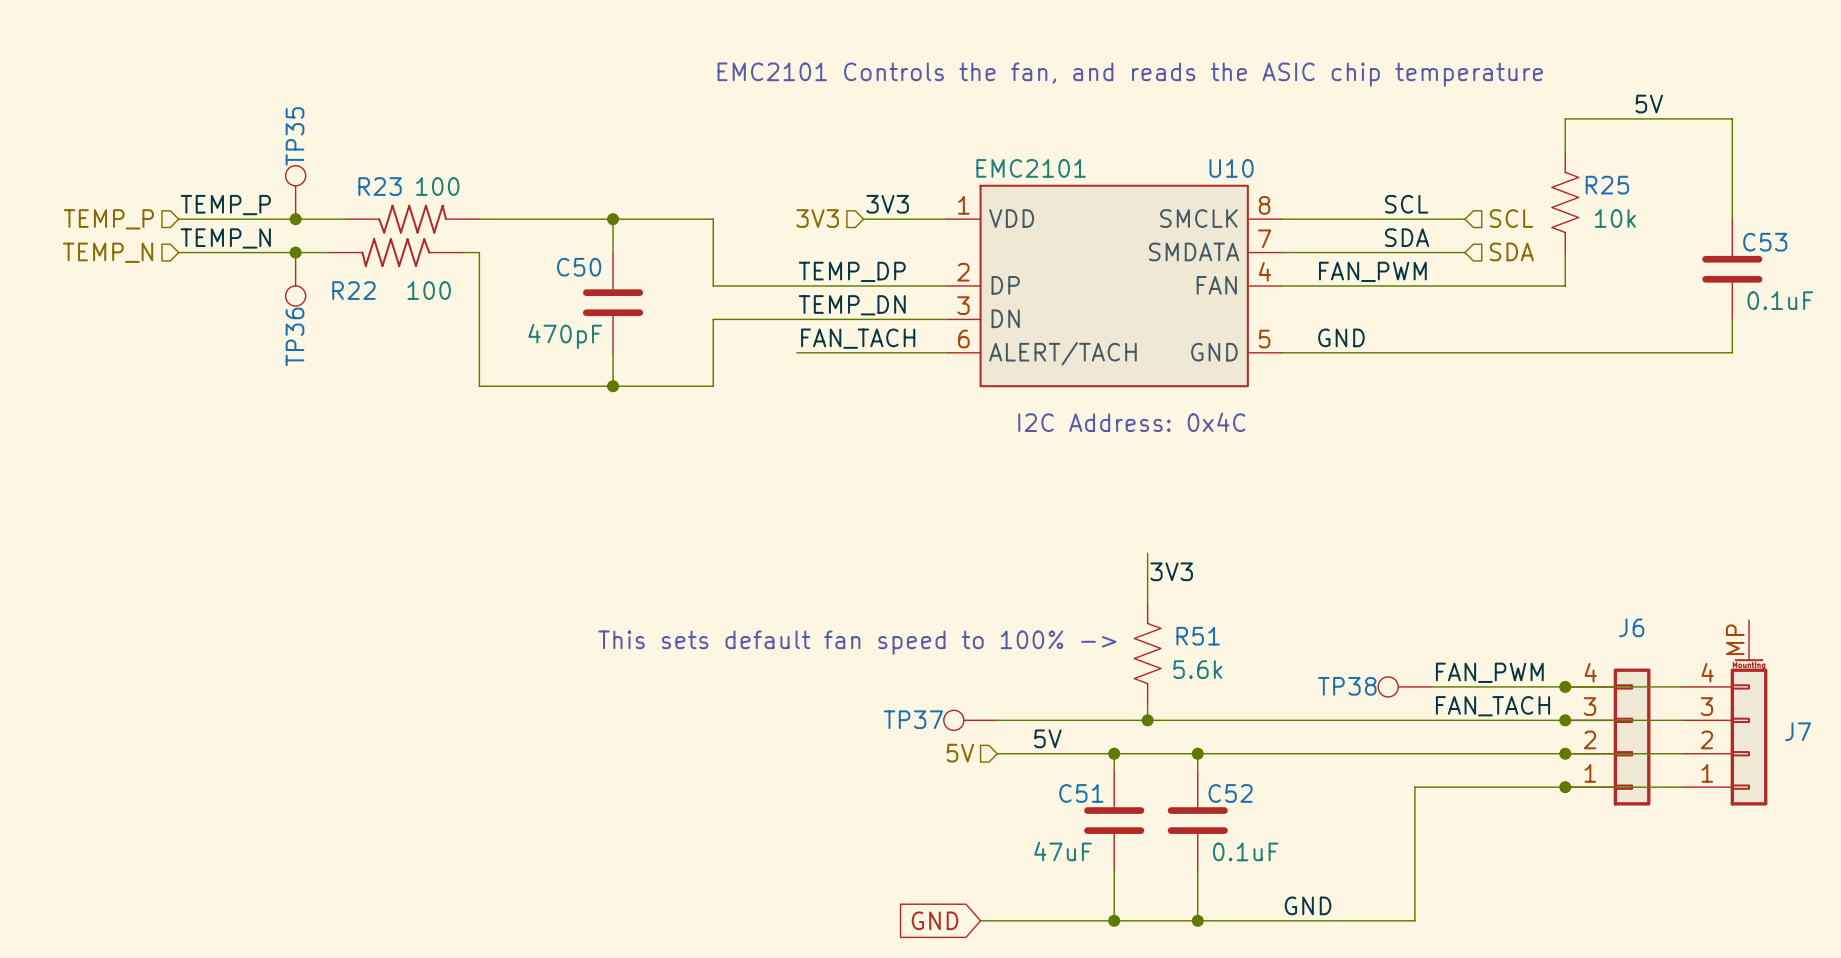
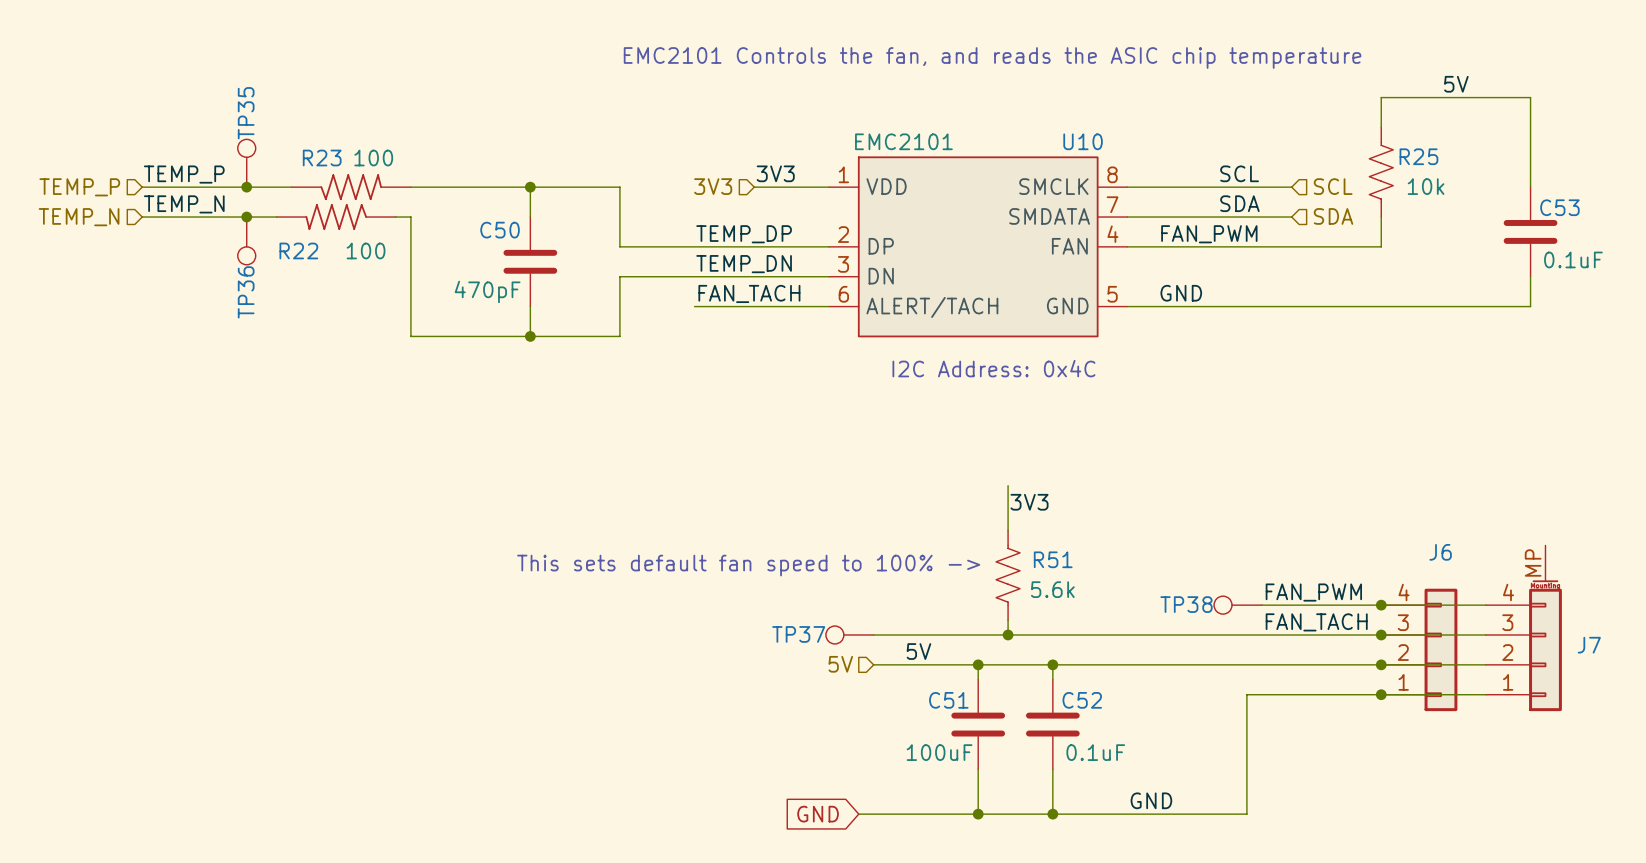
C51 value: 47uF (1063, 851) -> 100uF (939, 752)

